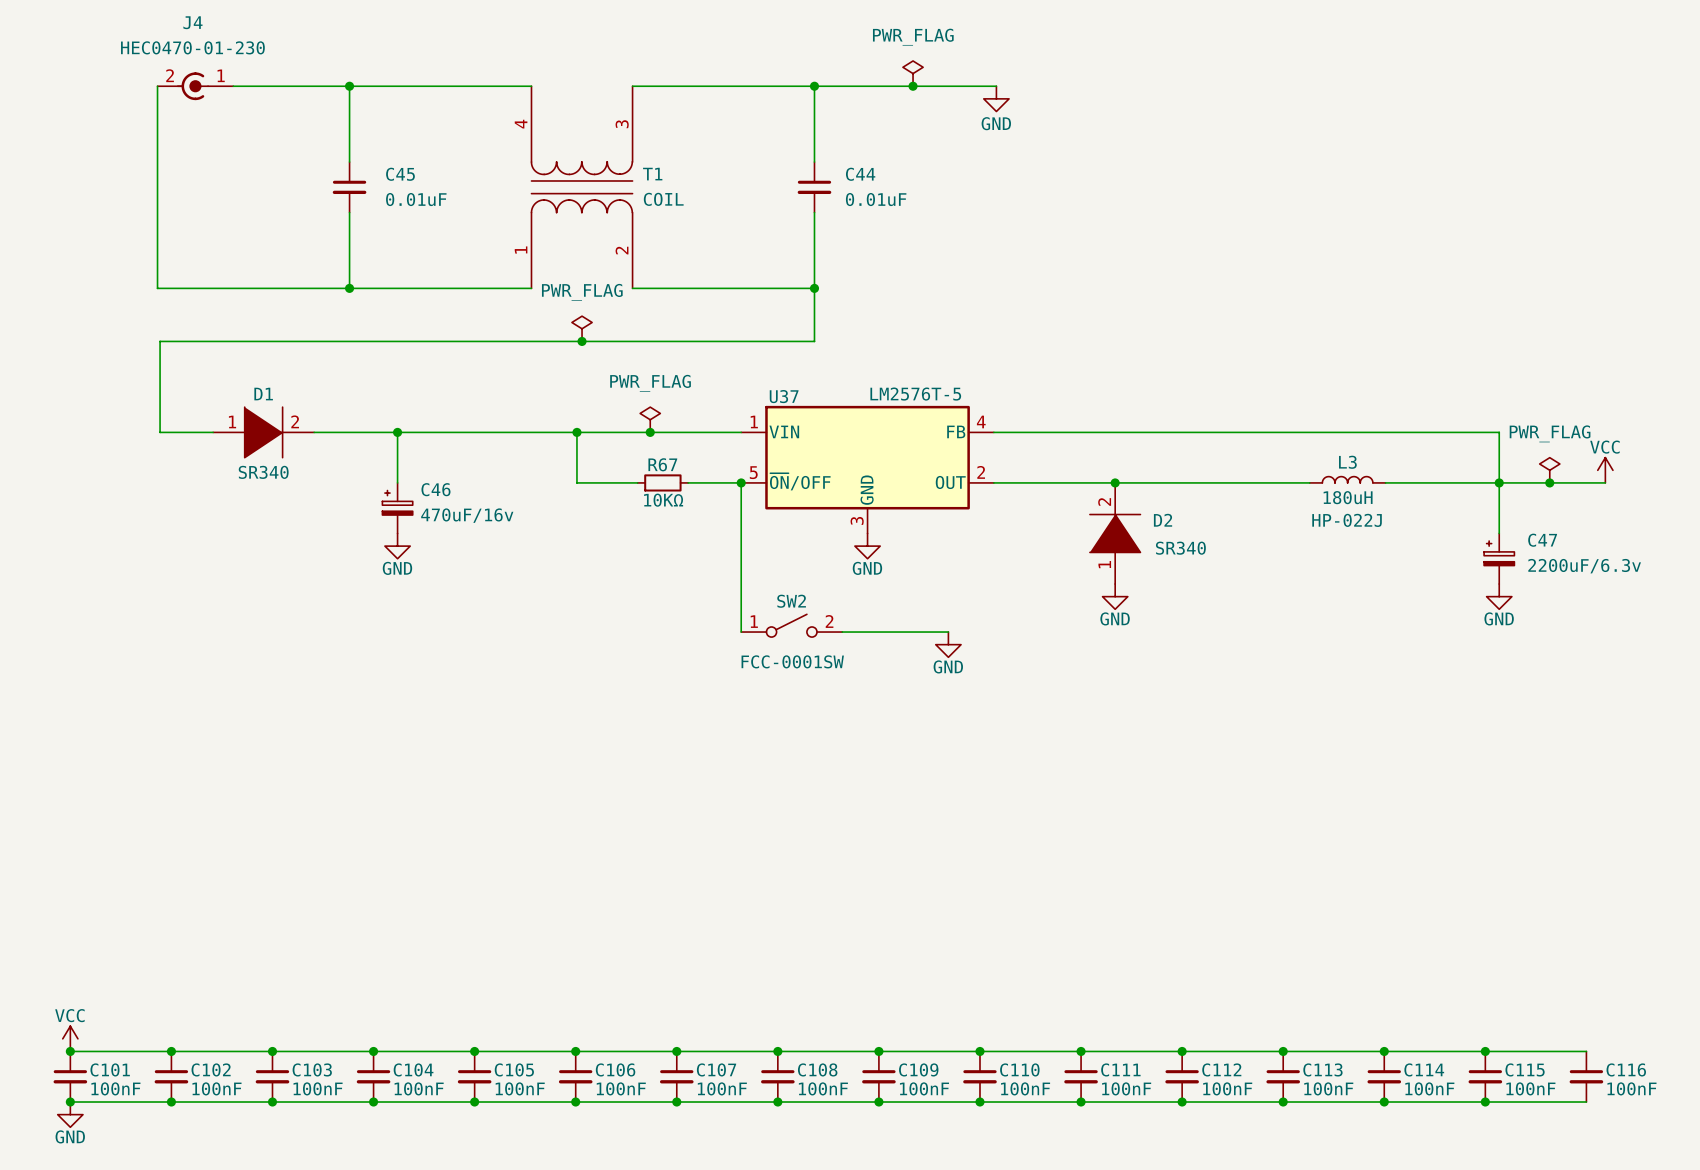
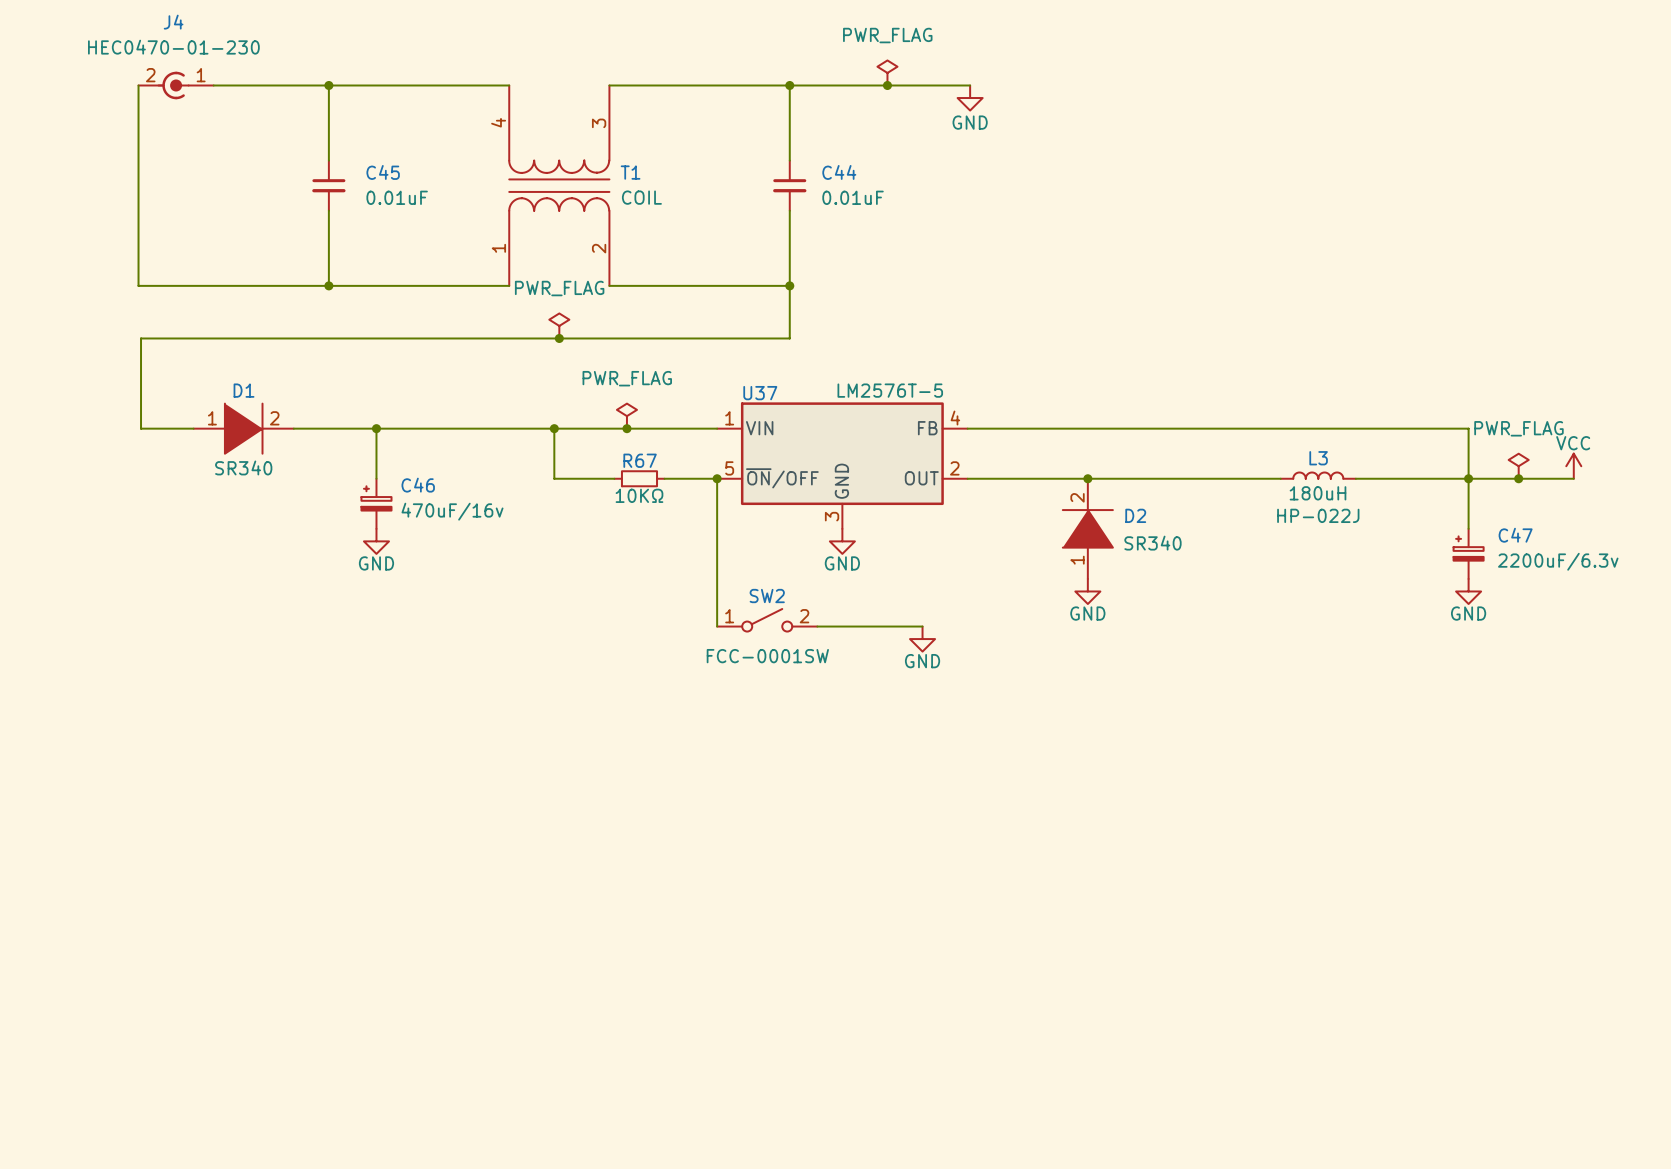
power symbol: VCC (70, 1038) -> none
wire: (70, 1051) (1586, 1051) -> none
junction: (70, 1051) -> none
junction: (171, 1051) -> none
junction: (272, 1051) -> none
junction: (373, 1051) -> none
junction: (474, 1051) -> none
junction: (575, 1051) -> none
junction: (676, 1051) -> none
junction: (777, 1051) -> none
junction: (878, 1051) -> none
junction: (979, 1051) -> none
junction: (1081, 1051) -> none
junction: (1182, 1051) -> none
junction: (1283, 1051) -> none
junction: (1384, 1051) -> none
junction: (1485, 1051) -> none
C101: 100nF (70, 1076) -> none
C102: 100nF (171, 1076) -> none
C103: 100nF (272, 1076) -> none
C104: 100nF (373, 1076) -> none
C105: 100nF (474, 1076) -> none
C106: 100nF (575, 1076) -> none
C107: 100nF (676, 1076) -> none
C108: 100nF (777, 1076) -> none
C109: 100nF (878, 1076) -> none
C110: 100nF (979, 1076) -> none
C111: 100nF (1081, 1076) -> none
C112: 100nF (1182, 1076) -> none
C113: 100nF (1283, 1076) -> none
C114: 100nF (1384, 1076) -> none
C115: 100nF (1485, 1076) -> none
C116: 100nF (1586, 1076) -> none
wire: (70, 1102) (1586, 1102) -> none
junction: (70, 1102) -> none
junction: (171, 1102) -> none
junction: (272, 1102) -> none
junction: (373, 1102) -> none
junction: (474, 1102) -> none
junction: (575, 1102) -> none
junction: (676, 1102) -> none
junction: (777, 1102) -> none
junction: (878, 1102) -> none
junction: (979, 1102) -> none
junction: (1081, 1102) -> none
junction: (1182, 1102) -> none
junction: (1283, 1102) -> none
junction: (1384, 1102) -> none
junction: (1485, 1102) -> none
power symbol: GND (70, 1114) -> none

